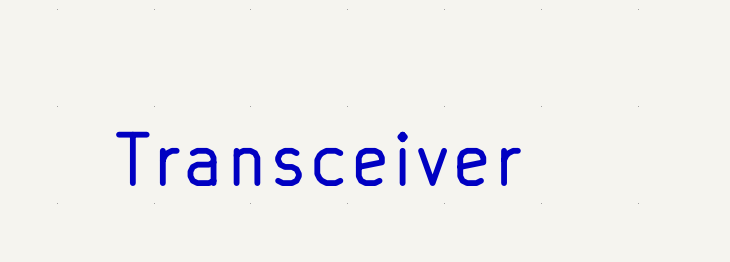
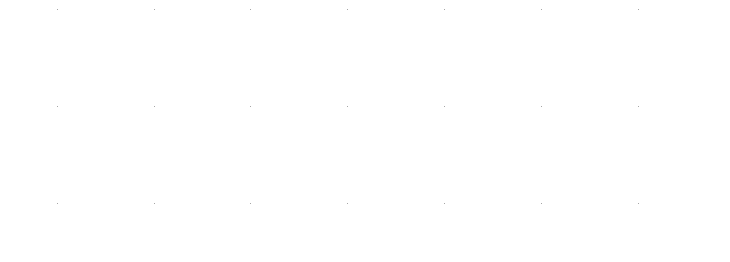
text: Transceiver (318, 158) -> none

